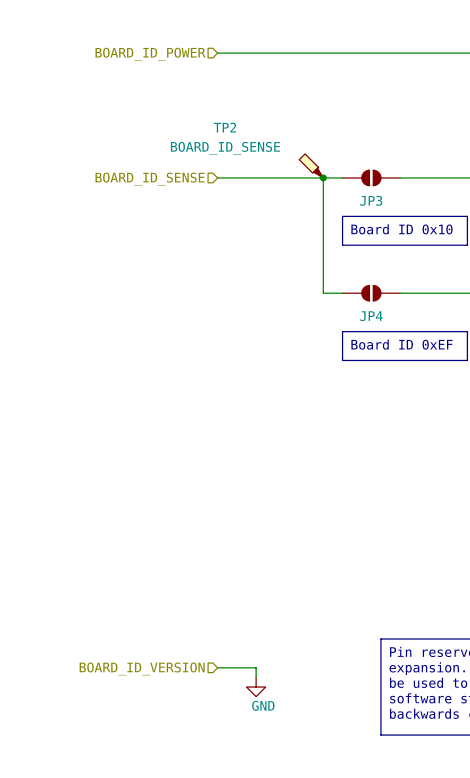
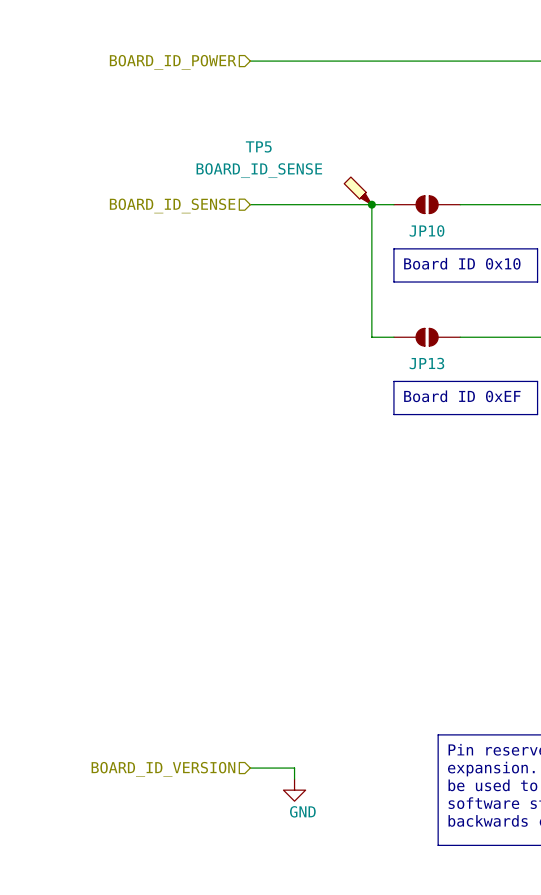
TP2 name: TP2 (224, 127) -> TP5 (258, 146)
JP3 name: JP3 (371, 200) -> JP10 (427, 230)
JP4 name: JP4 (371, 316) -> JP13 (426, 363)

